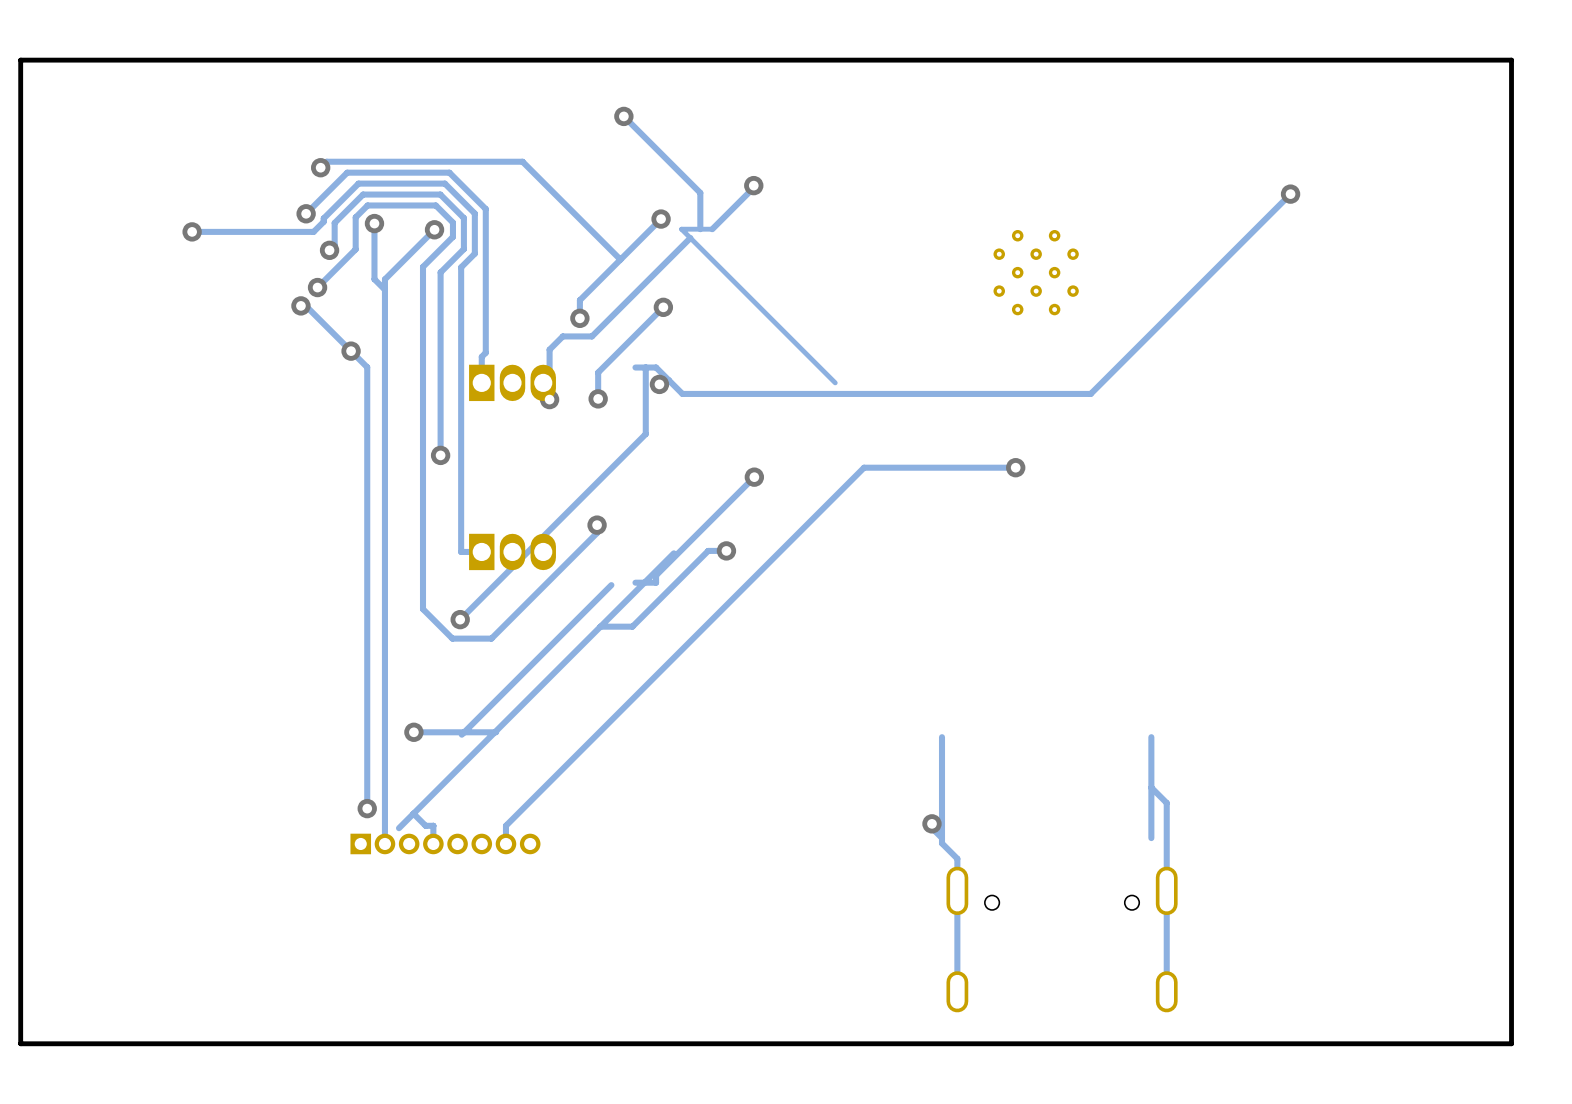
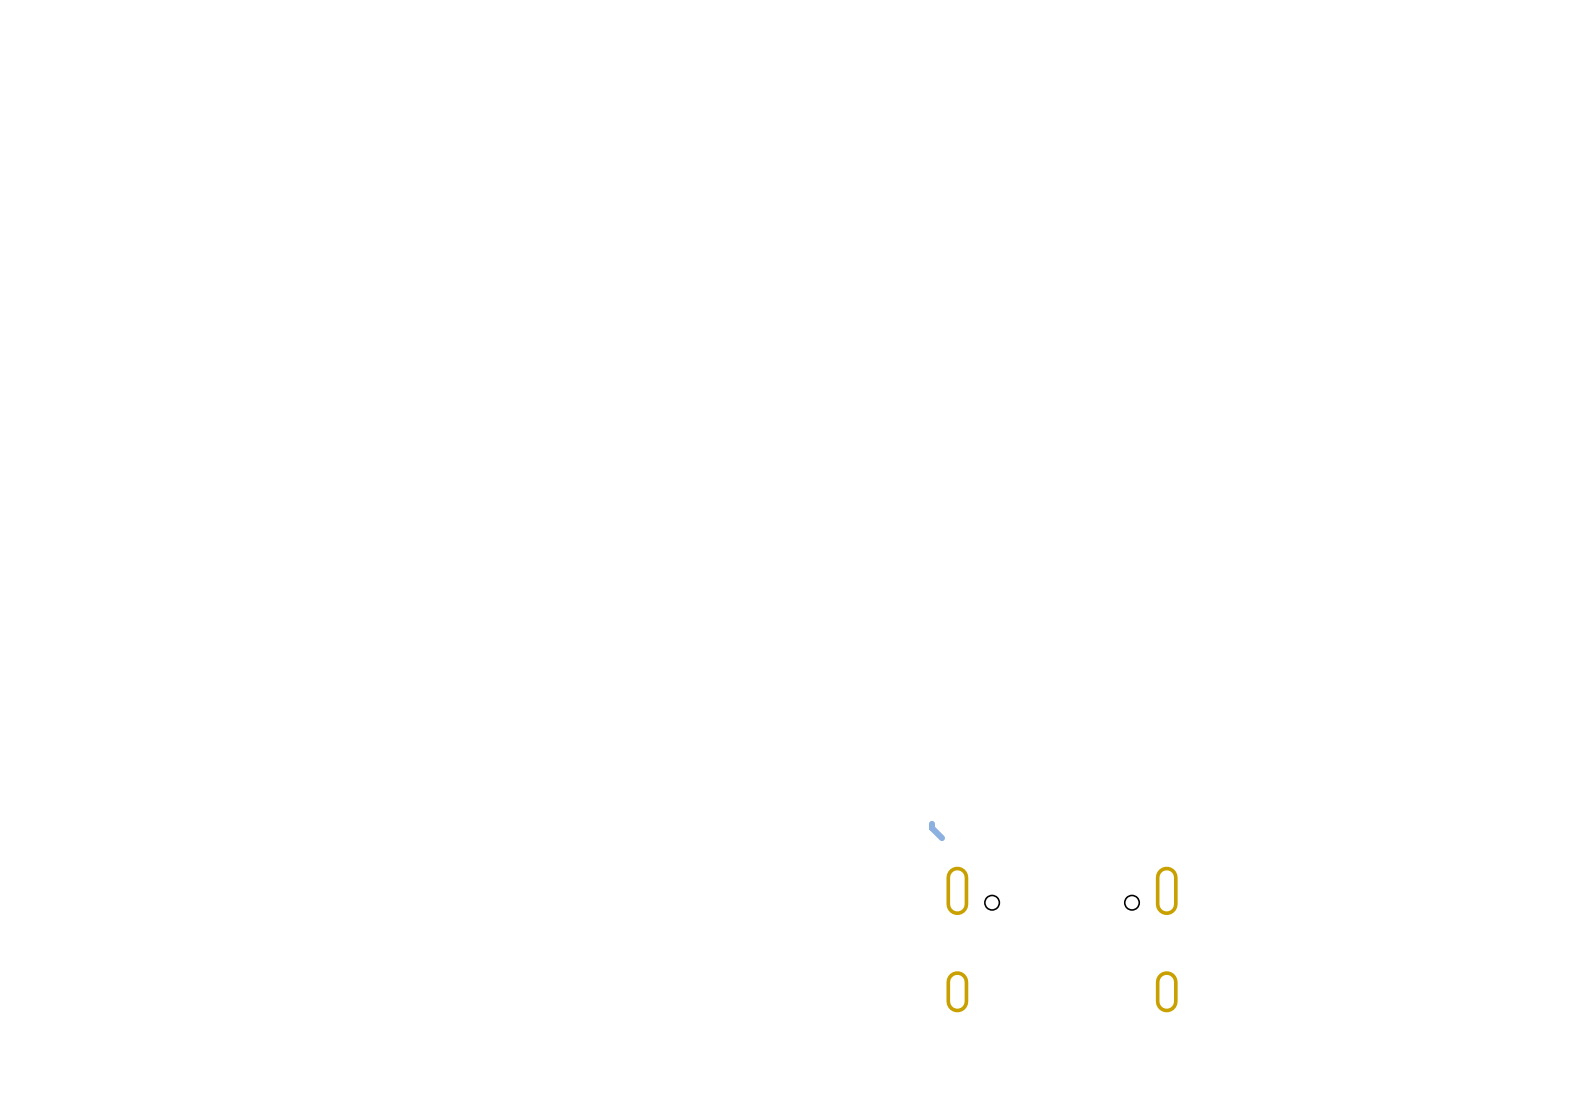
board edge: (1511, 60) (20, 60) (20, 1043) (1511, 1043) (1511, 60) -> none
track: (623, 116) (700, 192) (700, 229) -> none
via: (623, 116) -> none
track: (320, 167) (326, 161) (522, 161) (620, 259) -> none
via: (320, 167) -> none
track: (753, 185) (712, 229) (681, 229) (690, 238) -> none
via: (753, 185) -> none
track: (1290, 194) (1090, 393) (682, 393) (668, 380) -> none
via: (1290, 194) -> none
track: (306, 213) (347, 172) (449, 172) (485, 209) (485, 352) (481, 356) (481, 382) -> none
via: (306, 213) -> none
track: (661, 219) (579, 300) (579, 318) -> none
via: (661, 219) -> none
track: (374, 223) (374, 279) (384, 289) -> none
via: (374, 223) -> none
track: (434, 229) (384, 279) (384, 843) -> none
via: (434, 229) -> none
track: (192, 231) (313, 231) (323, 221) (323, 218) (358, 183) (444, 183) (474, 213) (474, 253) (461, 267) (461, 551) (481, 551) -> none
via: (192, 231) -> none
track: (690, 238) (591, 336) (562, 336) (549, 349) (549, 399) -> none
track: (690, 238) (835, 382) -> none
track: (329, 250) (334, 245) (334, 222) (363, 194) (440, 194) (463, 218) (463, 249) (440, 272) (440, 455) -> none
via: (329, 250) -> none
part: (1036, 272) -> none
track: (317, 287) (355, 249) (355, 217) (367, 205) (435, 205) (452, 222) (452, 236) (423, 266) (423, 609) (452, 638) (491, 638) (597, 532) (597, 525) -> none
via: (317, 287) -> none
track: (300, 305) (305, 305) (367, 367) (367, 808) -> none
via: (300, 305) -> none
track: (663, 307) (598, 372) (598, 398) -> none
via: (663, 307) -> none
via: (579, 318) -> none
via: (351, 351) -> none
track: (635, 367) (656, 367) (668, 380) -> none
track: (645, 367) (645, 434) (460, 619) -> none
part: (512, 382) -> none
via: (659, 384) -> none
via: (598, 398) -> none
via: (549, 399) -> none
via: (440, 455) -> none
track: (1015, 467) (864, 467) (505, 825) (505, 843) -> none
via: (1015, 467) -> none
track: (754, 477) (656, 575) (656, 582) (635, 582) -> none
via: (754, 477) -> none
via: (597, 525) -> none
track: (726, 550) (708, 550) (632, 626) (600, 626) -> none
via: (726, 550) -> none
part: (512, 551) -> none
track: (673, 553) (413, 813) -> none
track: (611, 585) (461, 734) -> none
via: (460, 619) -> none
via: (413, 732) -> none
track: (496, 732) (413, 732) -> none
track: (942, 737) (942, 843) (957, 858) (957, 991) -> none
track: (1151, 737) (1151, 838) -> none
track: (1151, 787) (1166, 803) (1166, 991) -> none
via: (367, 808) -> none
track: (413, 813) (425, 825) (433, 825) (433, 843) -> none
track: (413, 813) (398, 828) -> none
via: (931, 823) -> none
part: (445, 843) -> none

